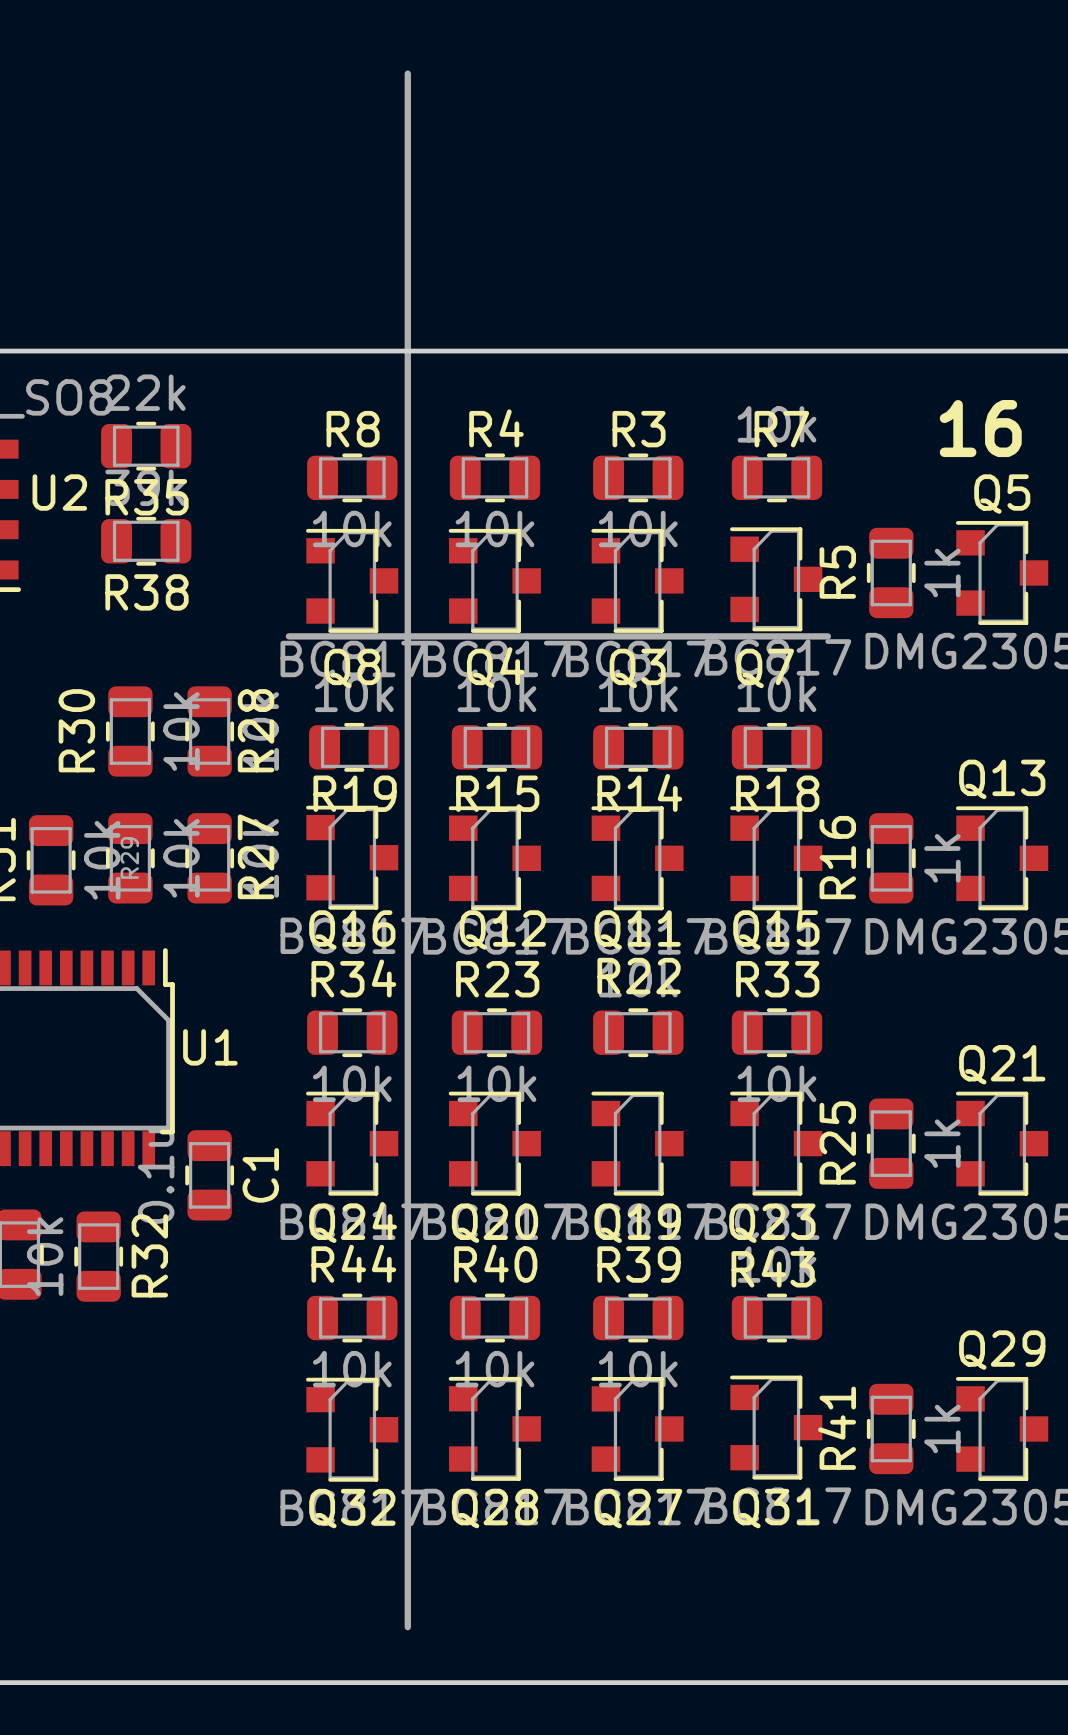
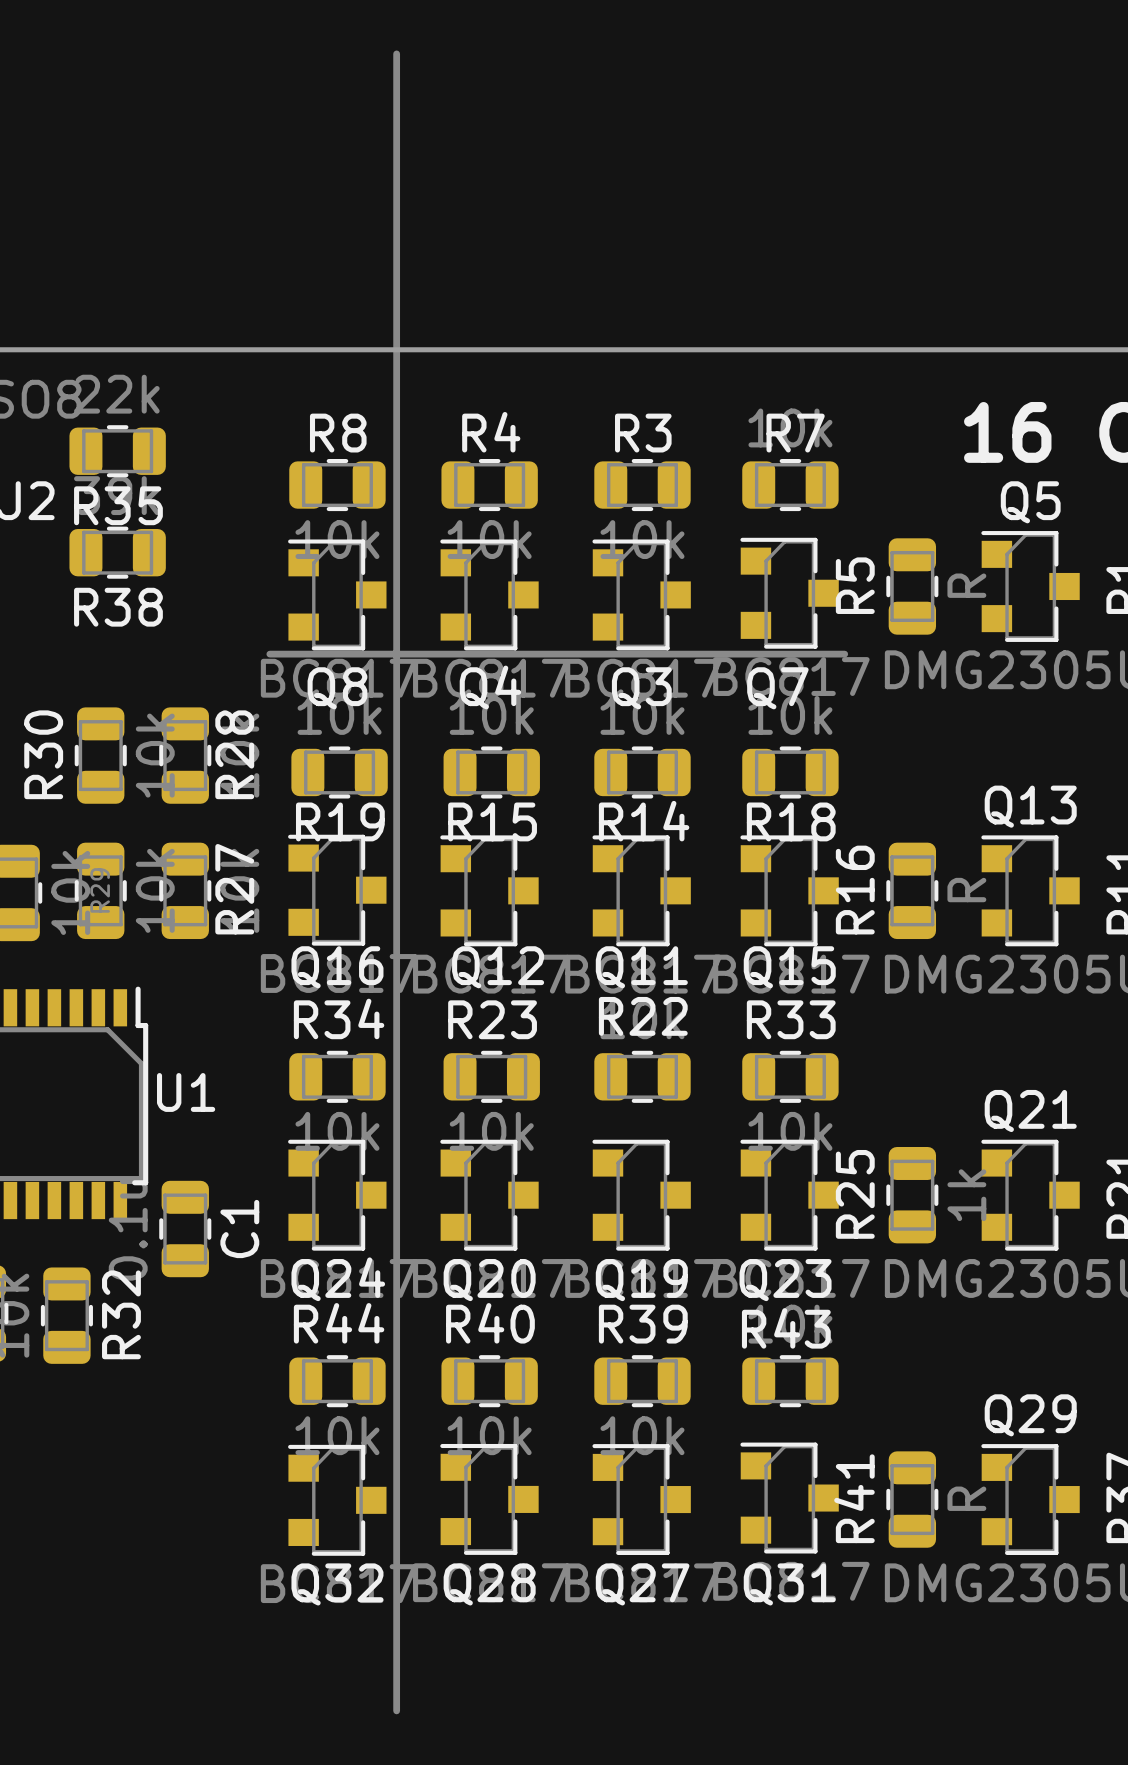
R5 value: 1k (942, 572) -> R (966, 585)
R16 value: 1k (942, 858) -> R (966, 890)
R41 value: 1k (942, 1428) -> R (966, 1498)

